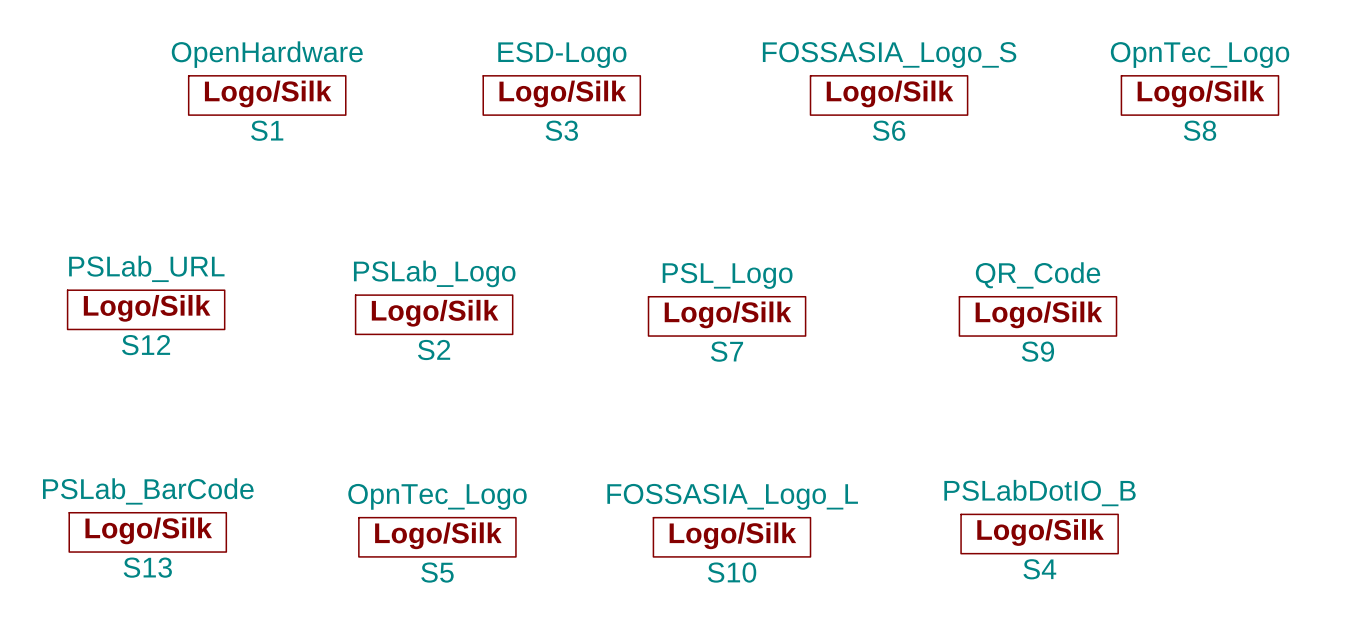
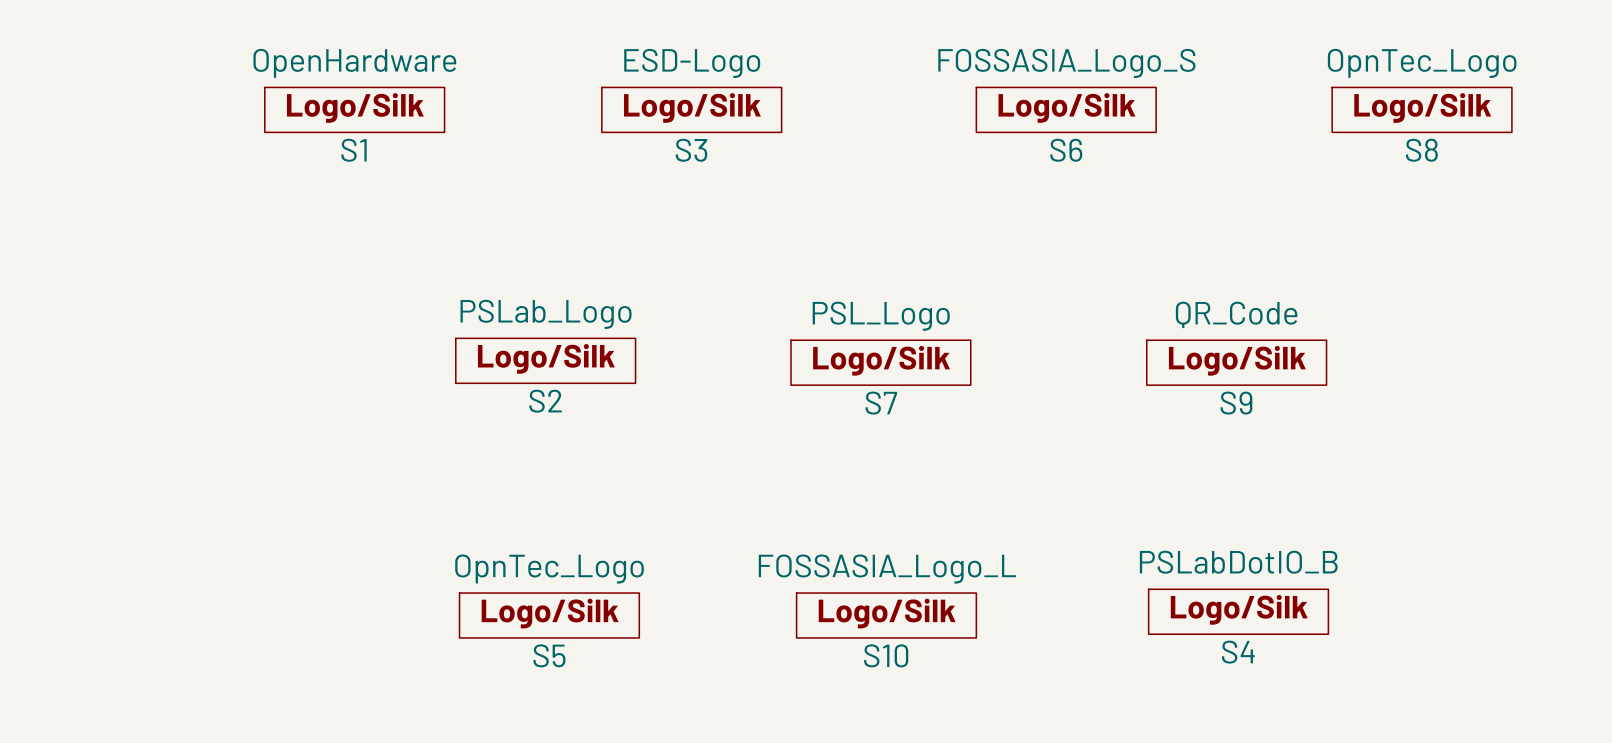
S12: PSLab_URL (146, 309) -> none
S13: PSLab_BarCode (147, 532) -> none

